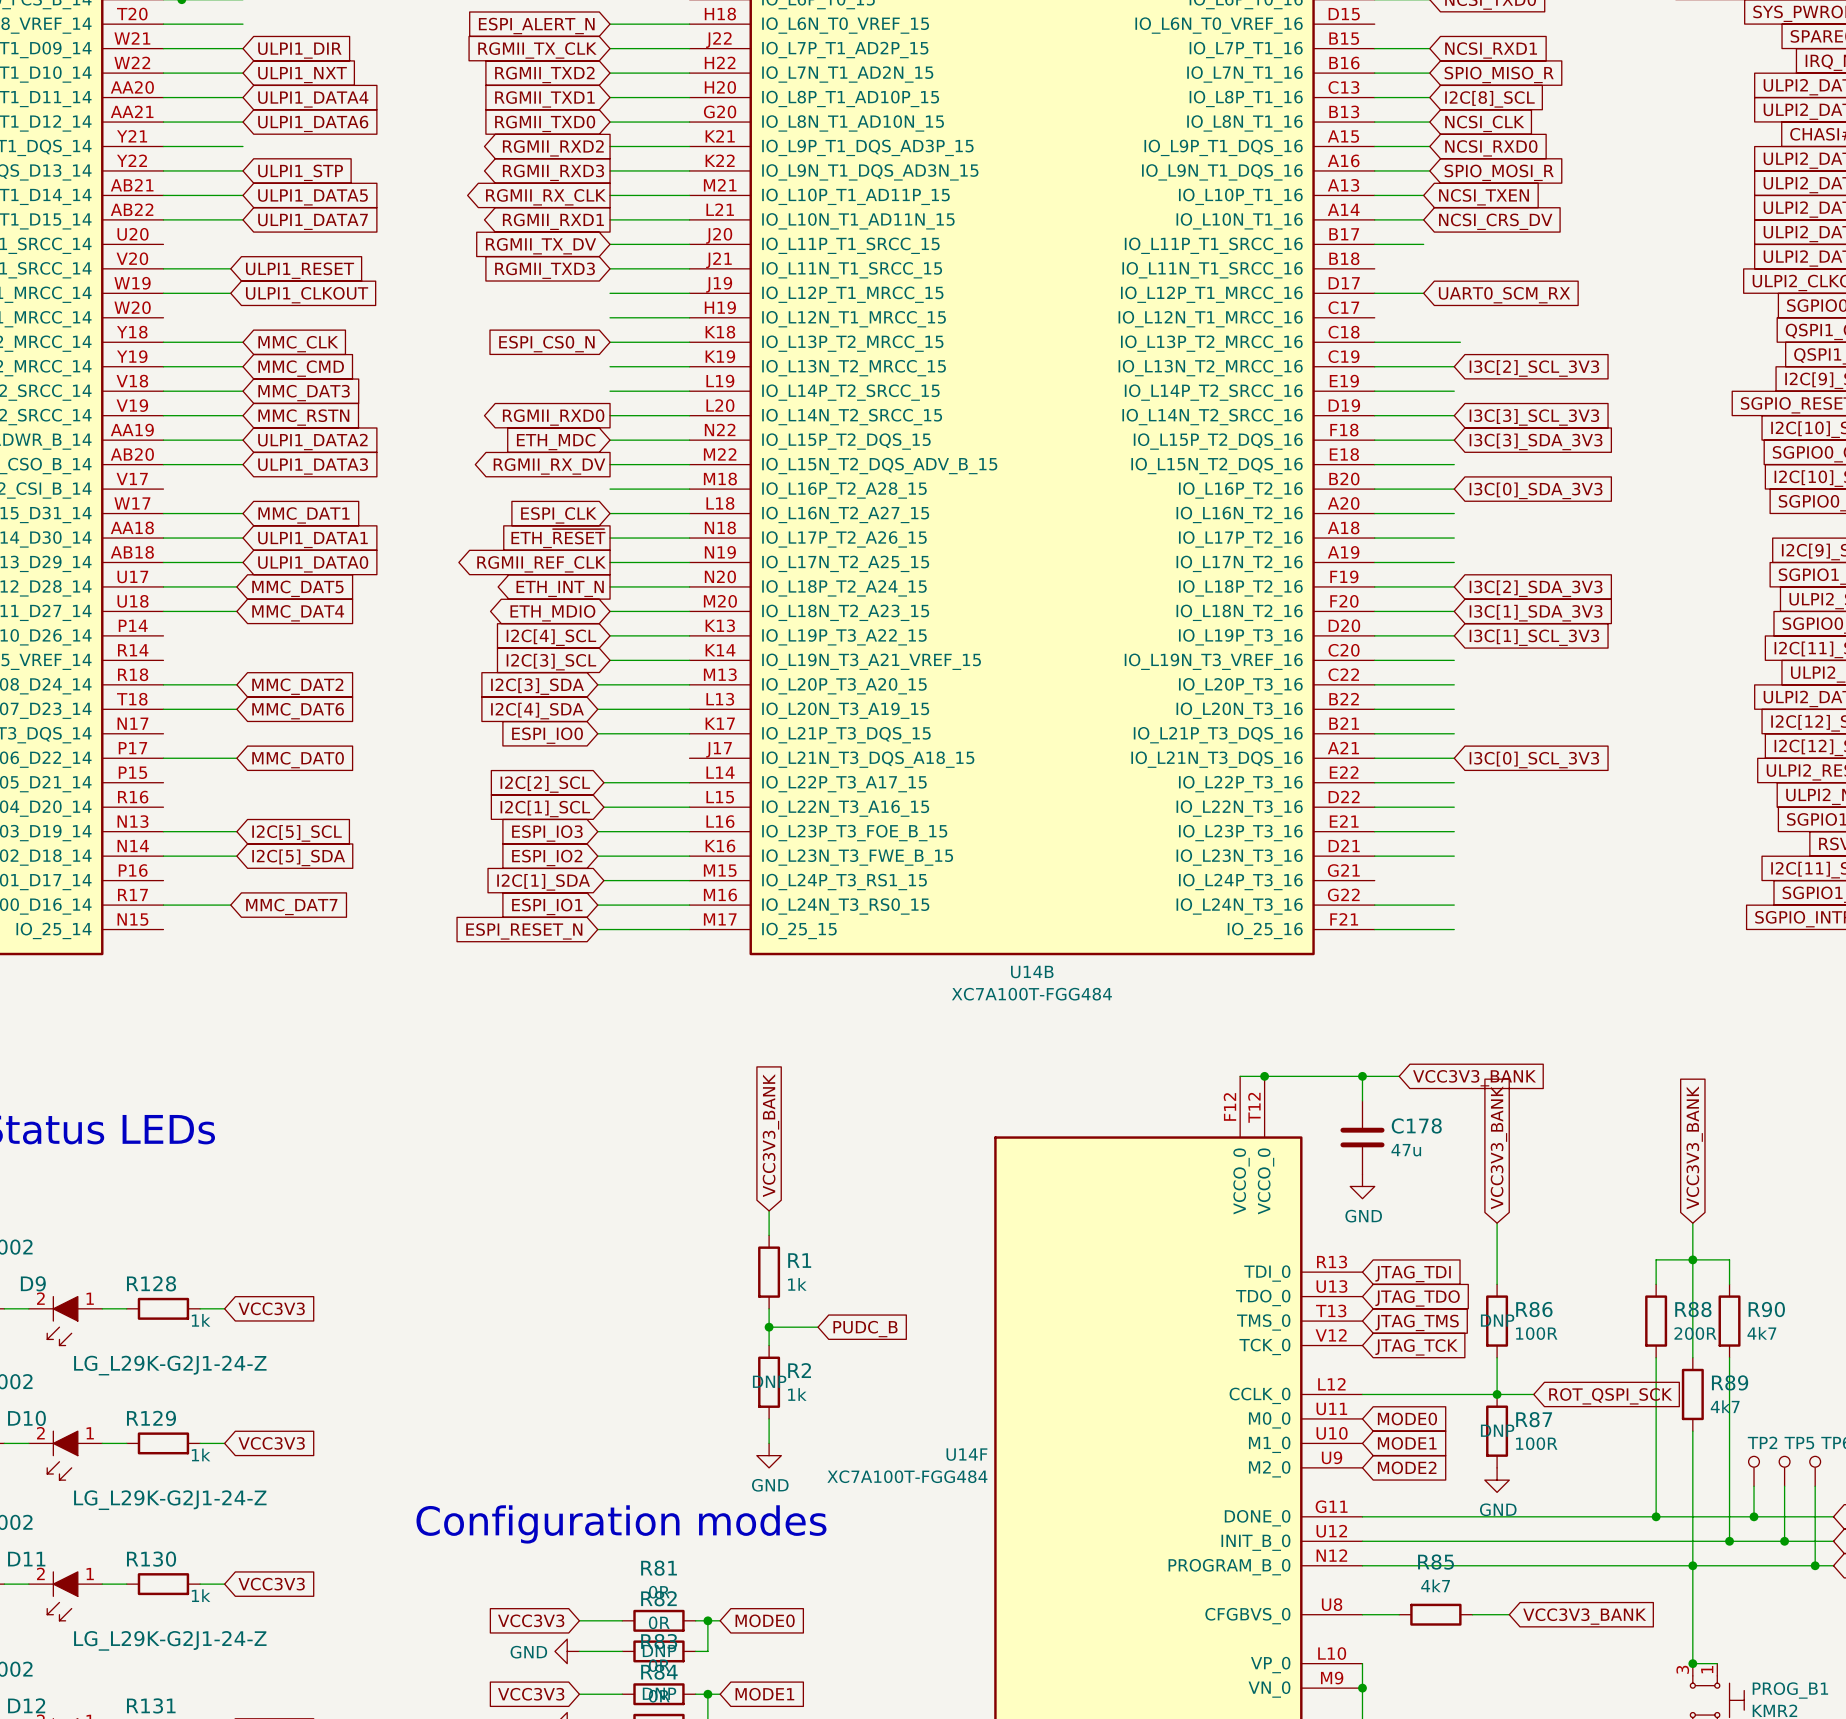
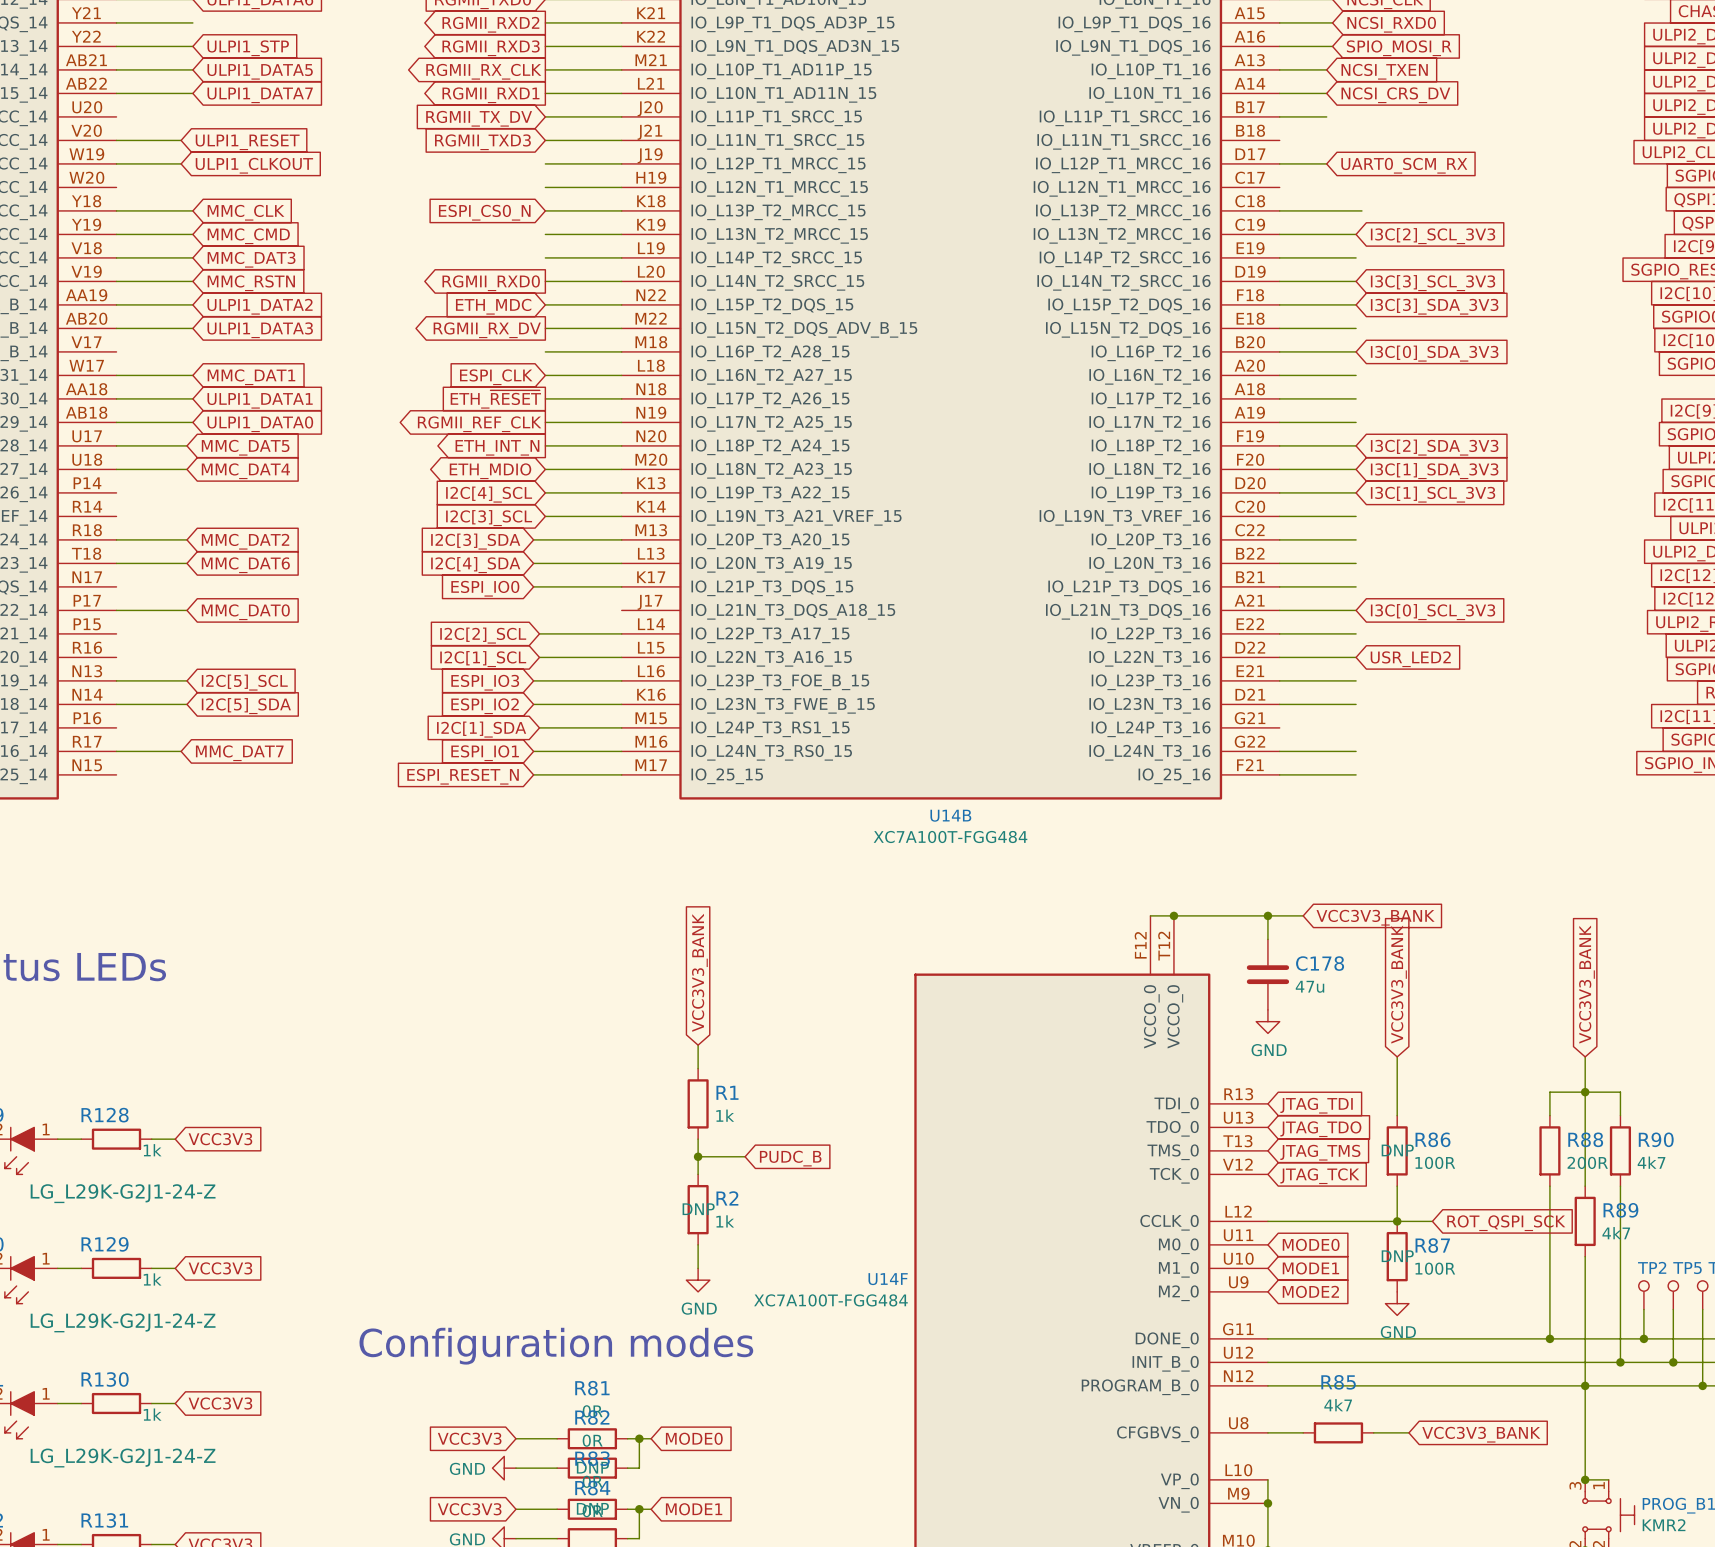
global label: none -> USR_LED2 (1410, 659)

